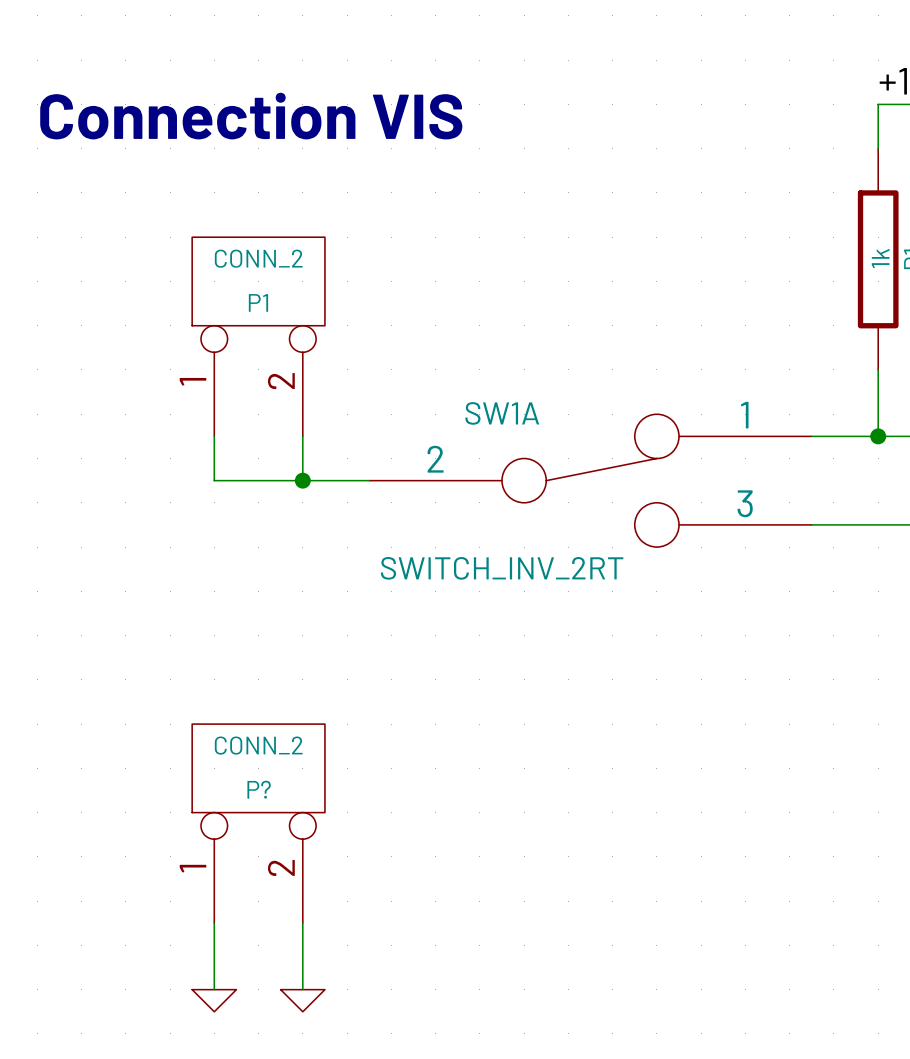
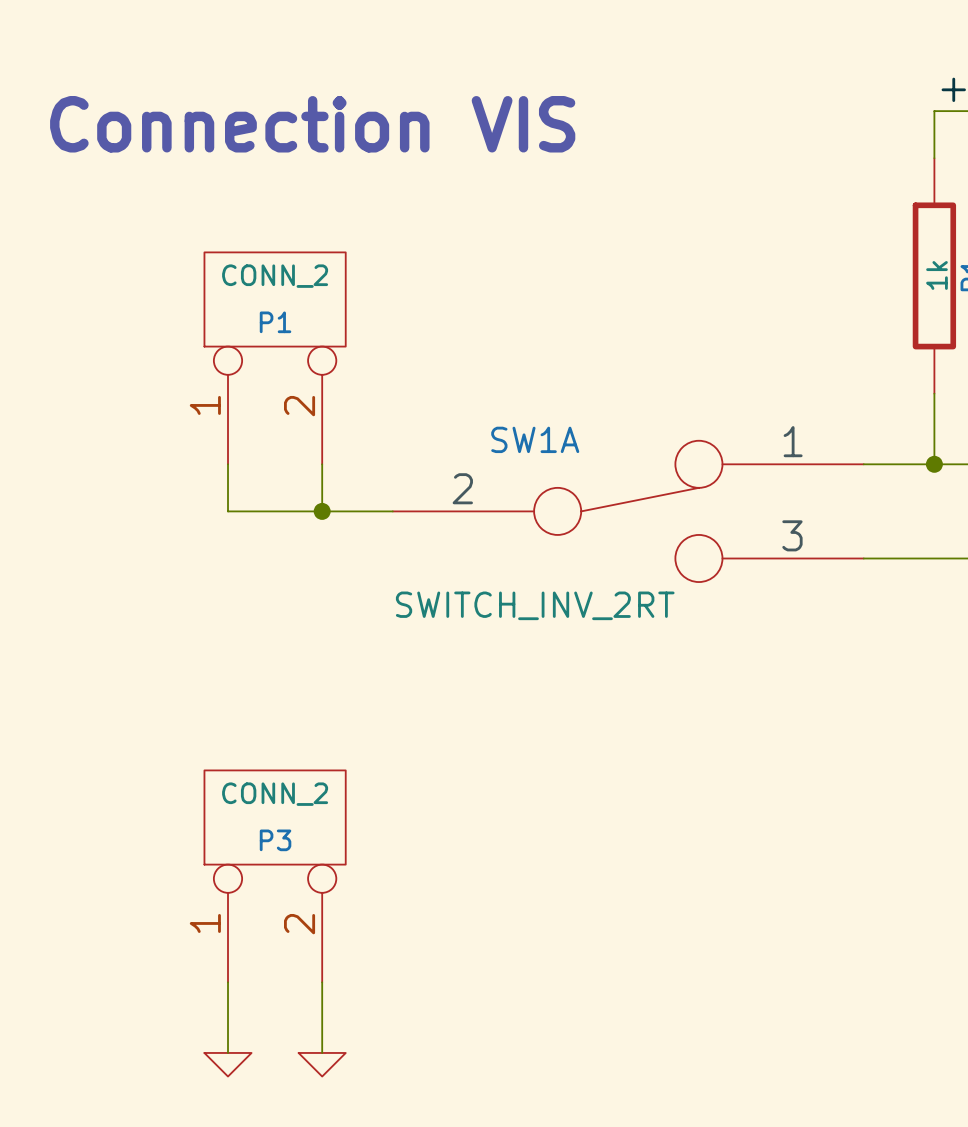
P? name: P? (259, 789) -> P3 (275, 840)

